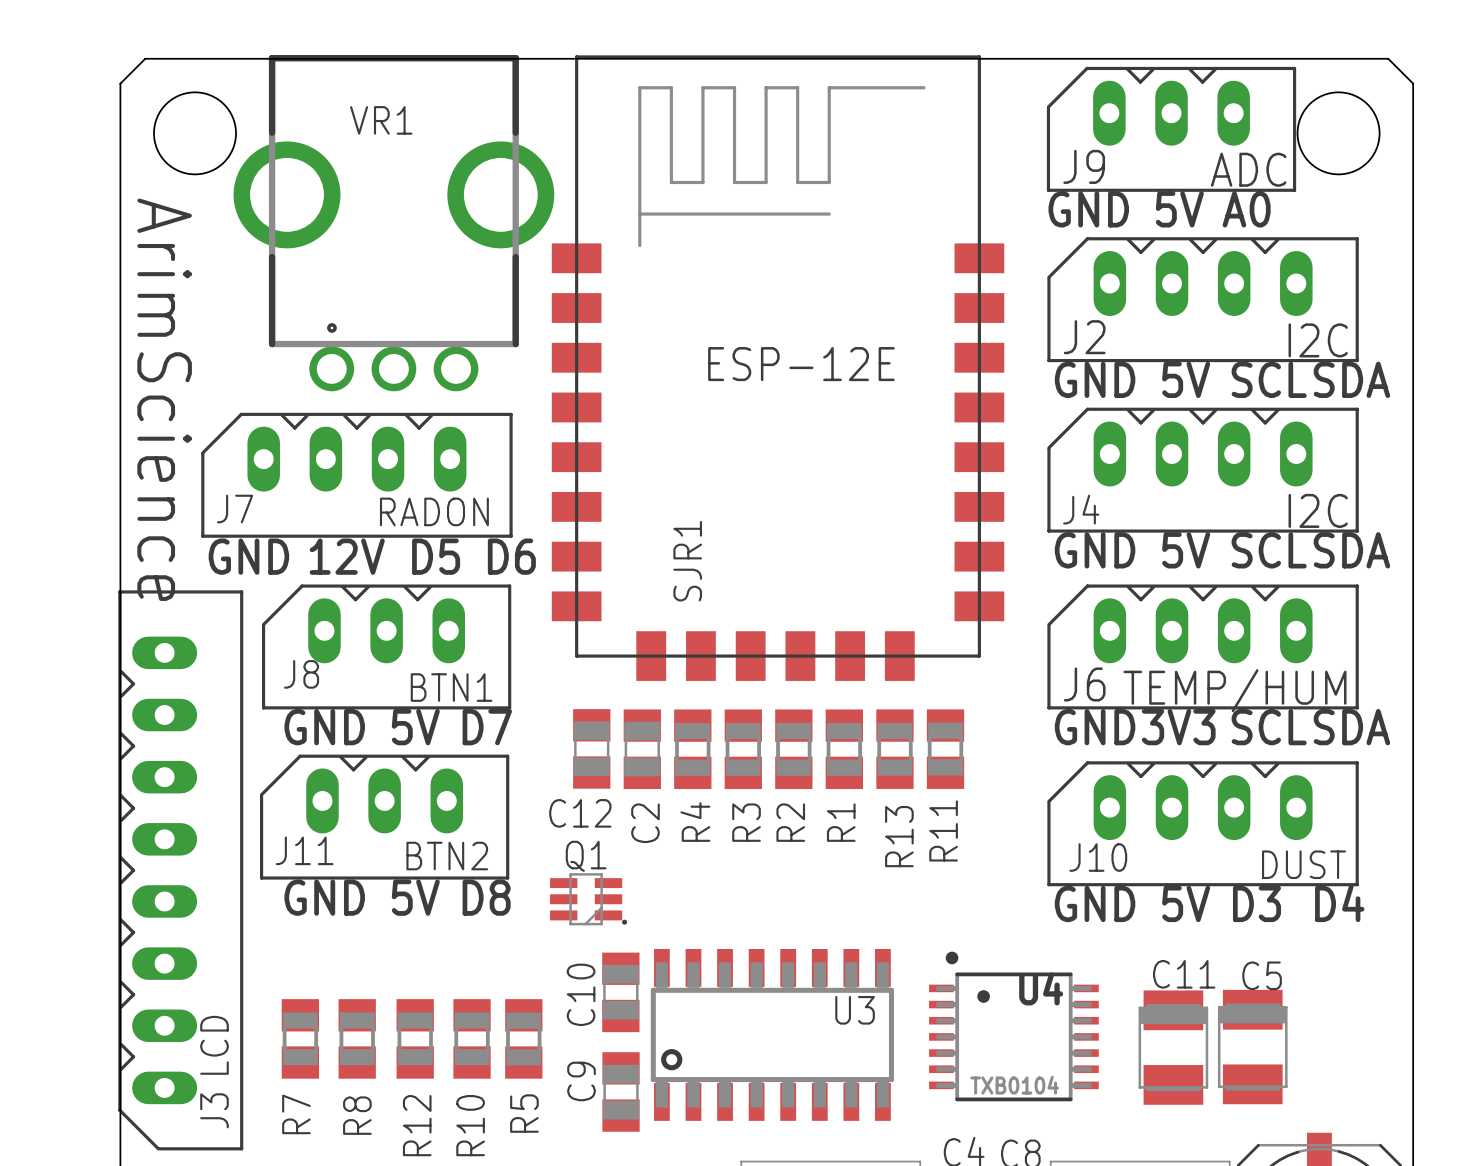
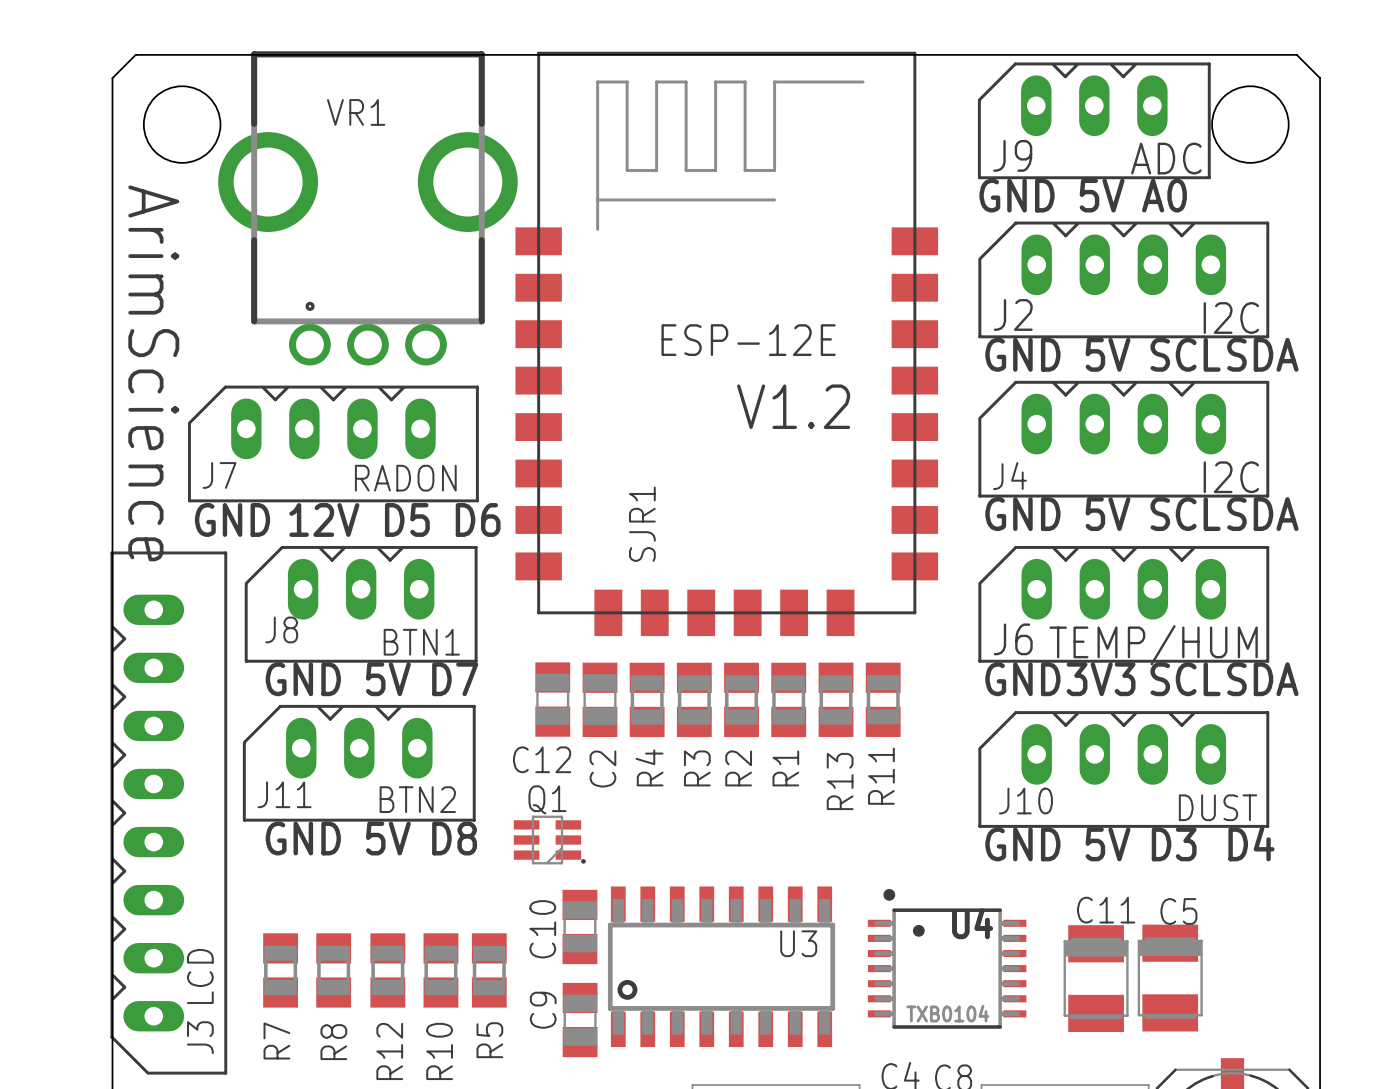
text: none -> V1.2 (793, 406)

